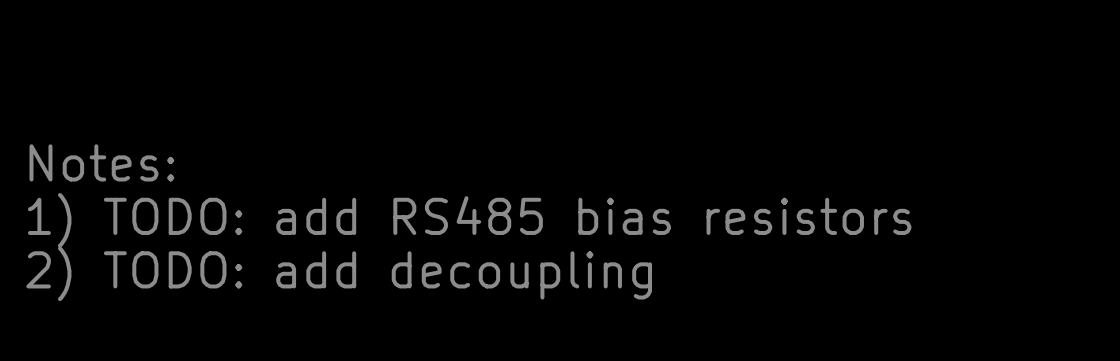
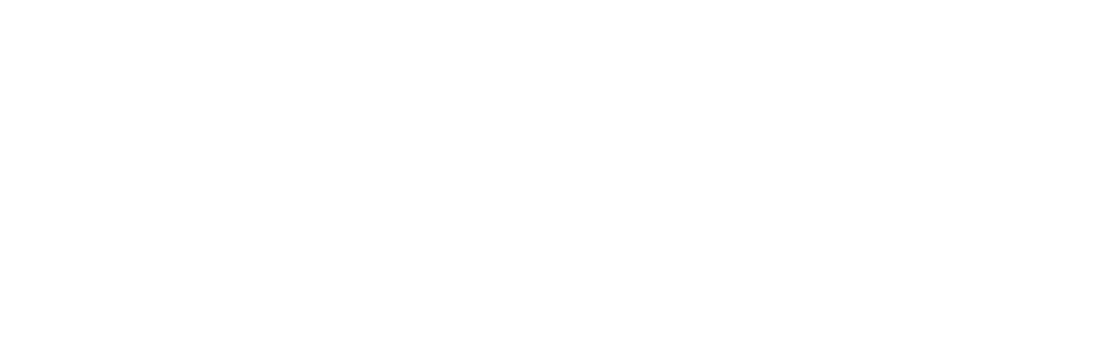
text: Notes: (101, 162) -> none
text: 1) TODO: add RS485 bias resistors (469, 220) -> none
text: 2) TODO: add decoupling (339, 273) -> none

